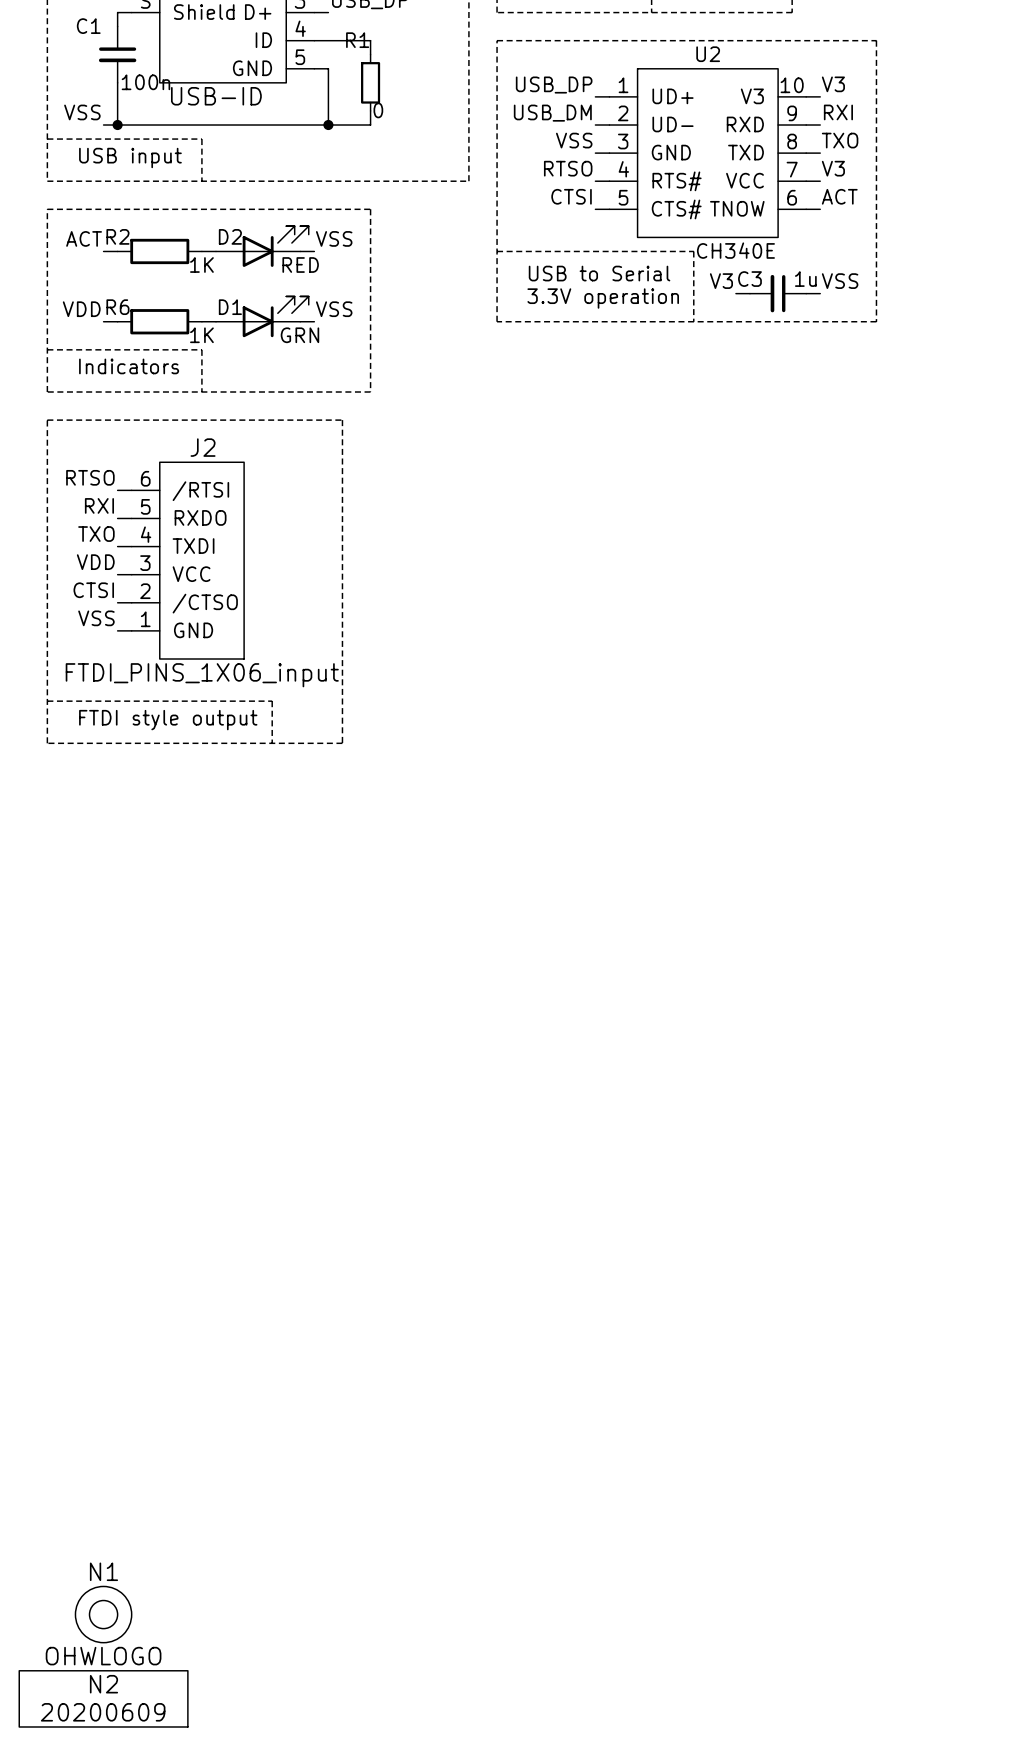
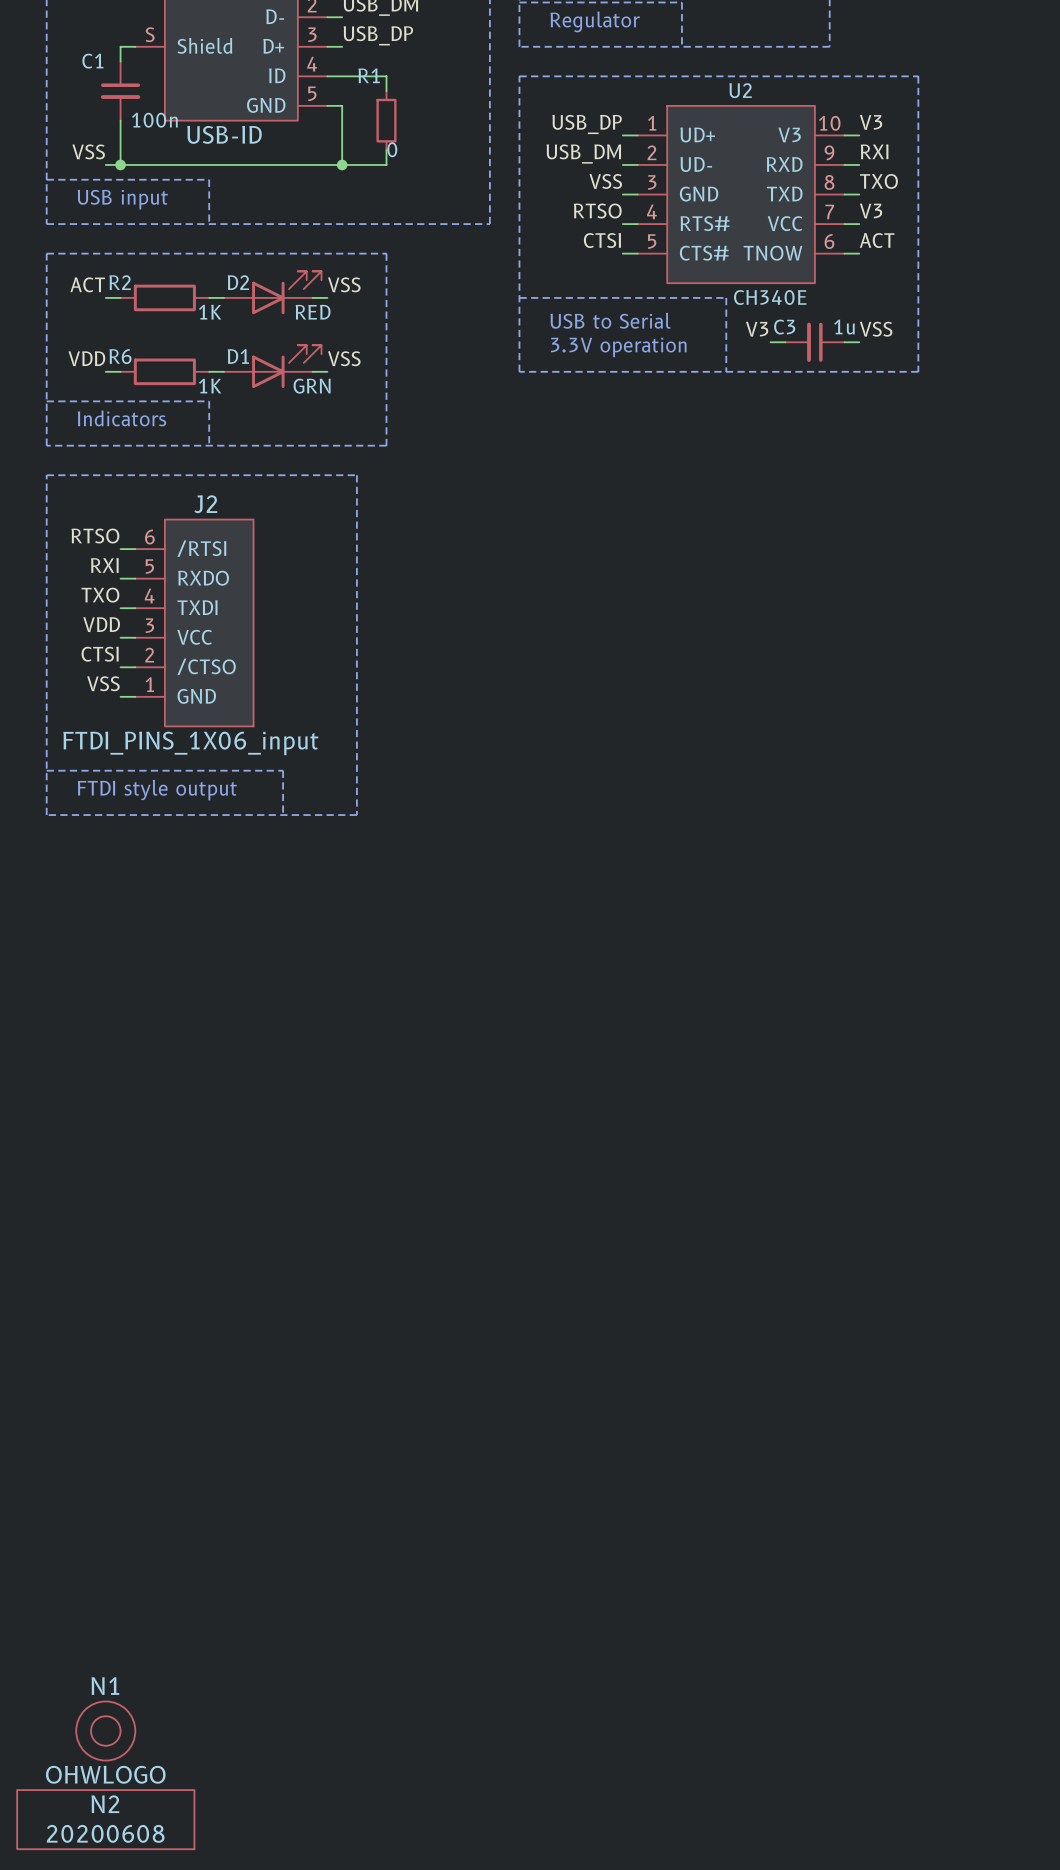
N2 value: 20200609 (103, 1712) -> 20200608 (105, 1833)

